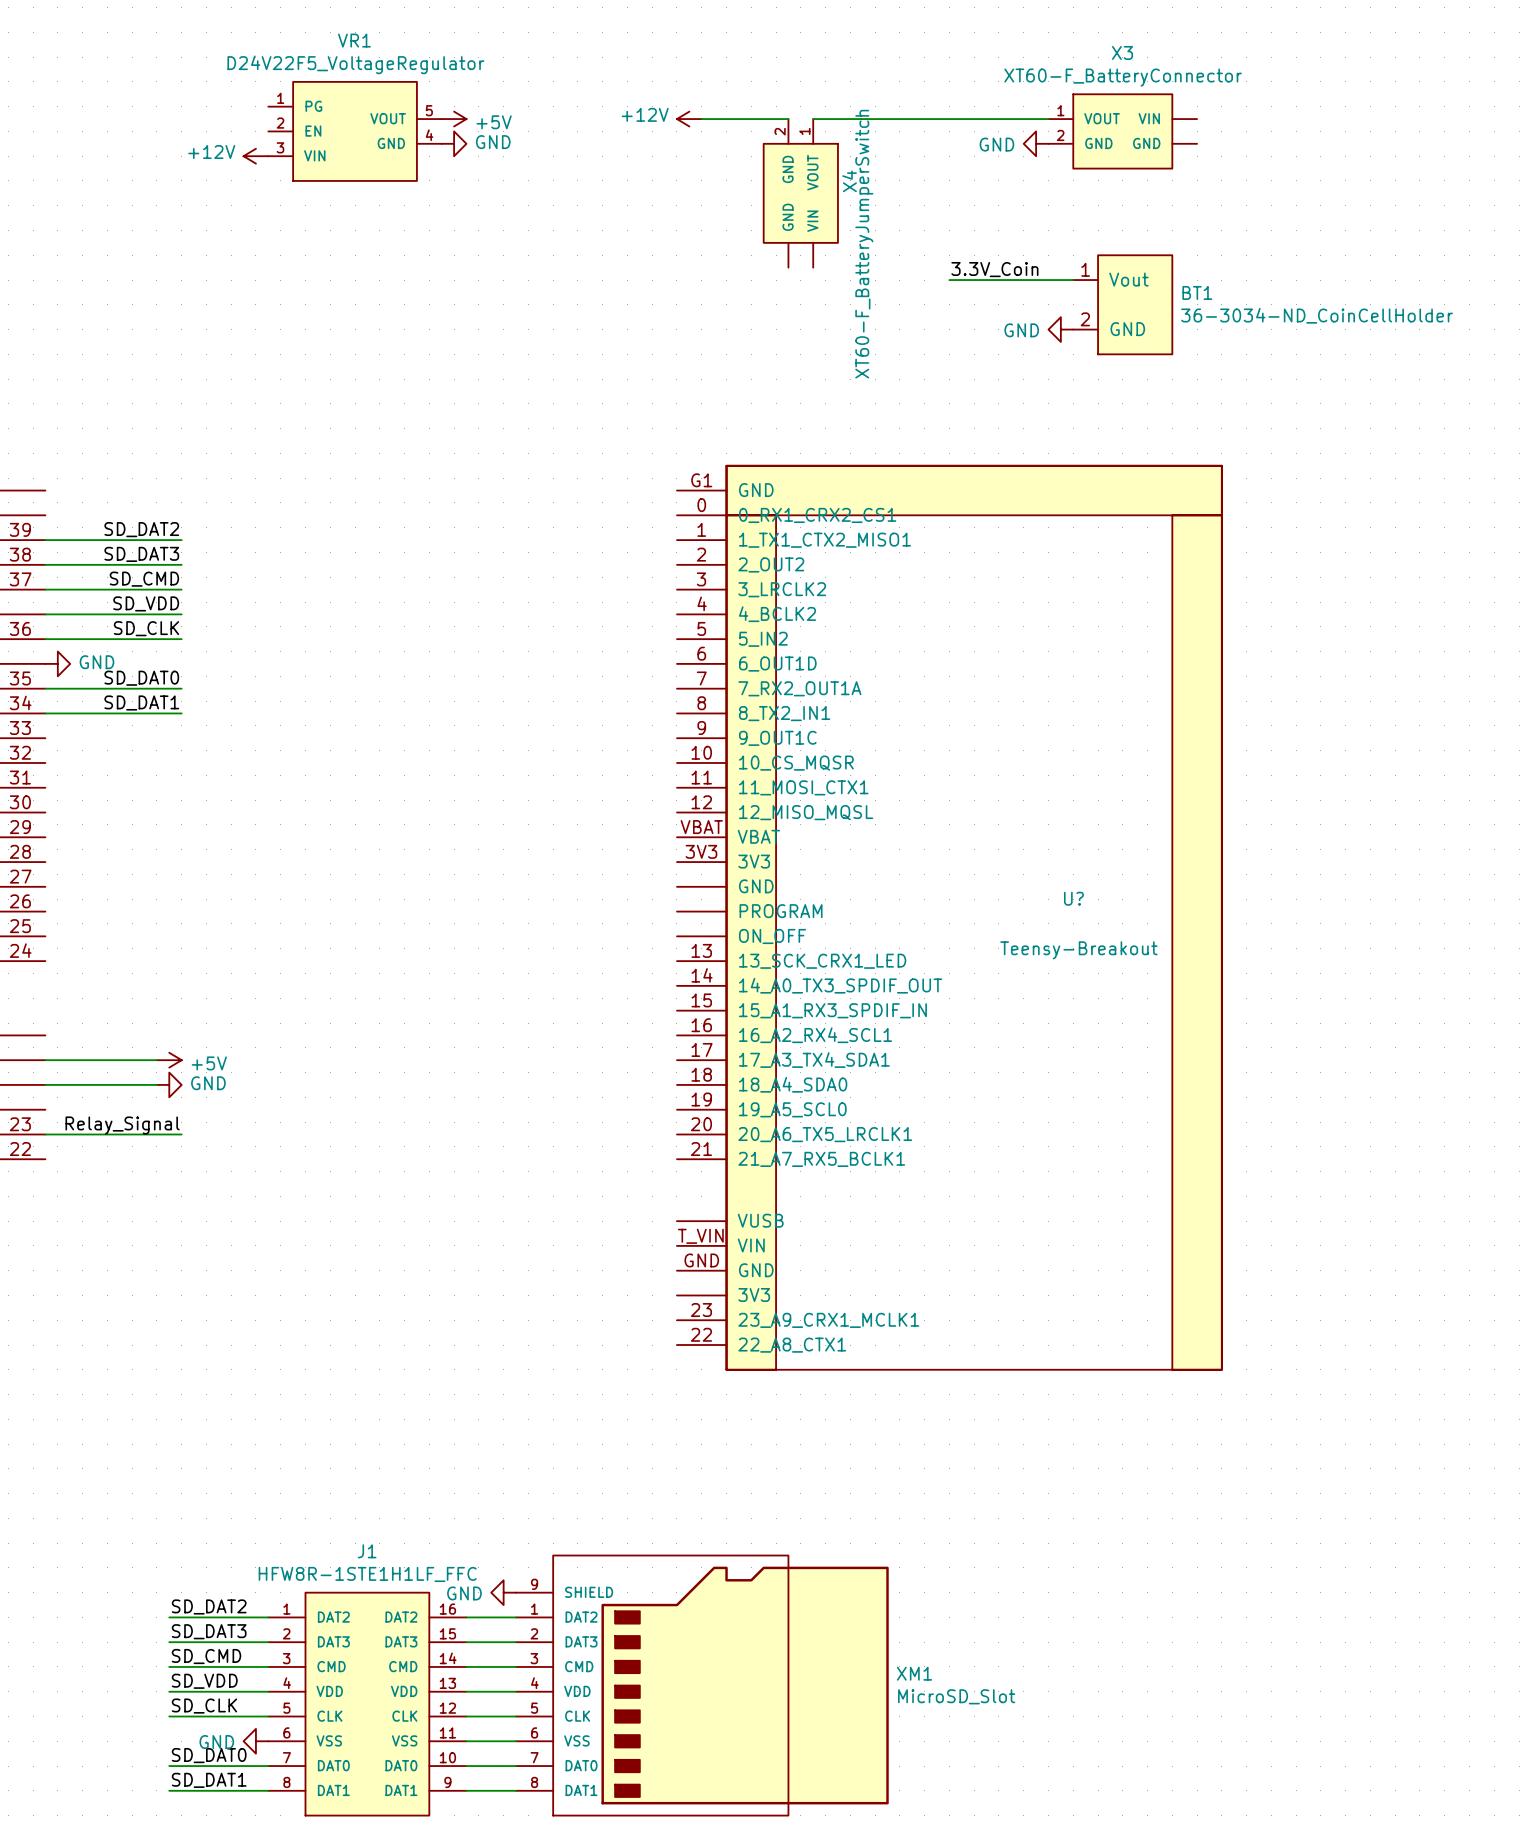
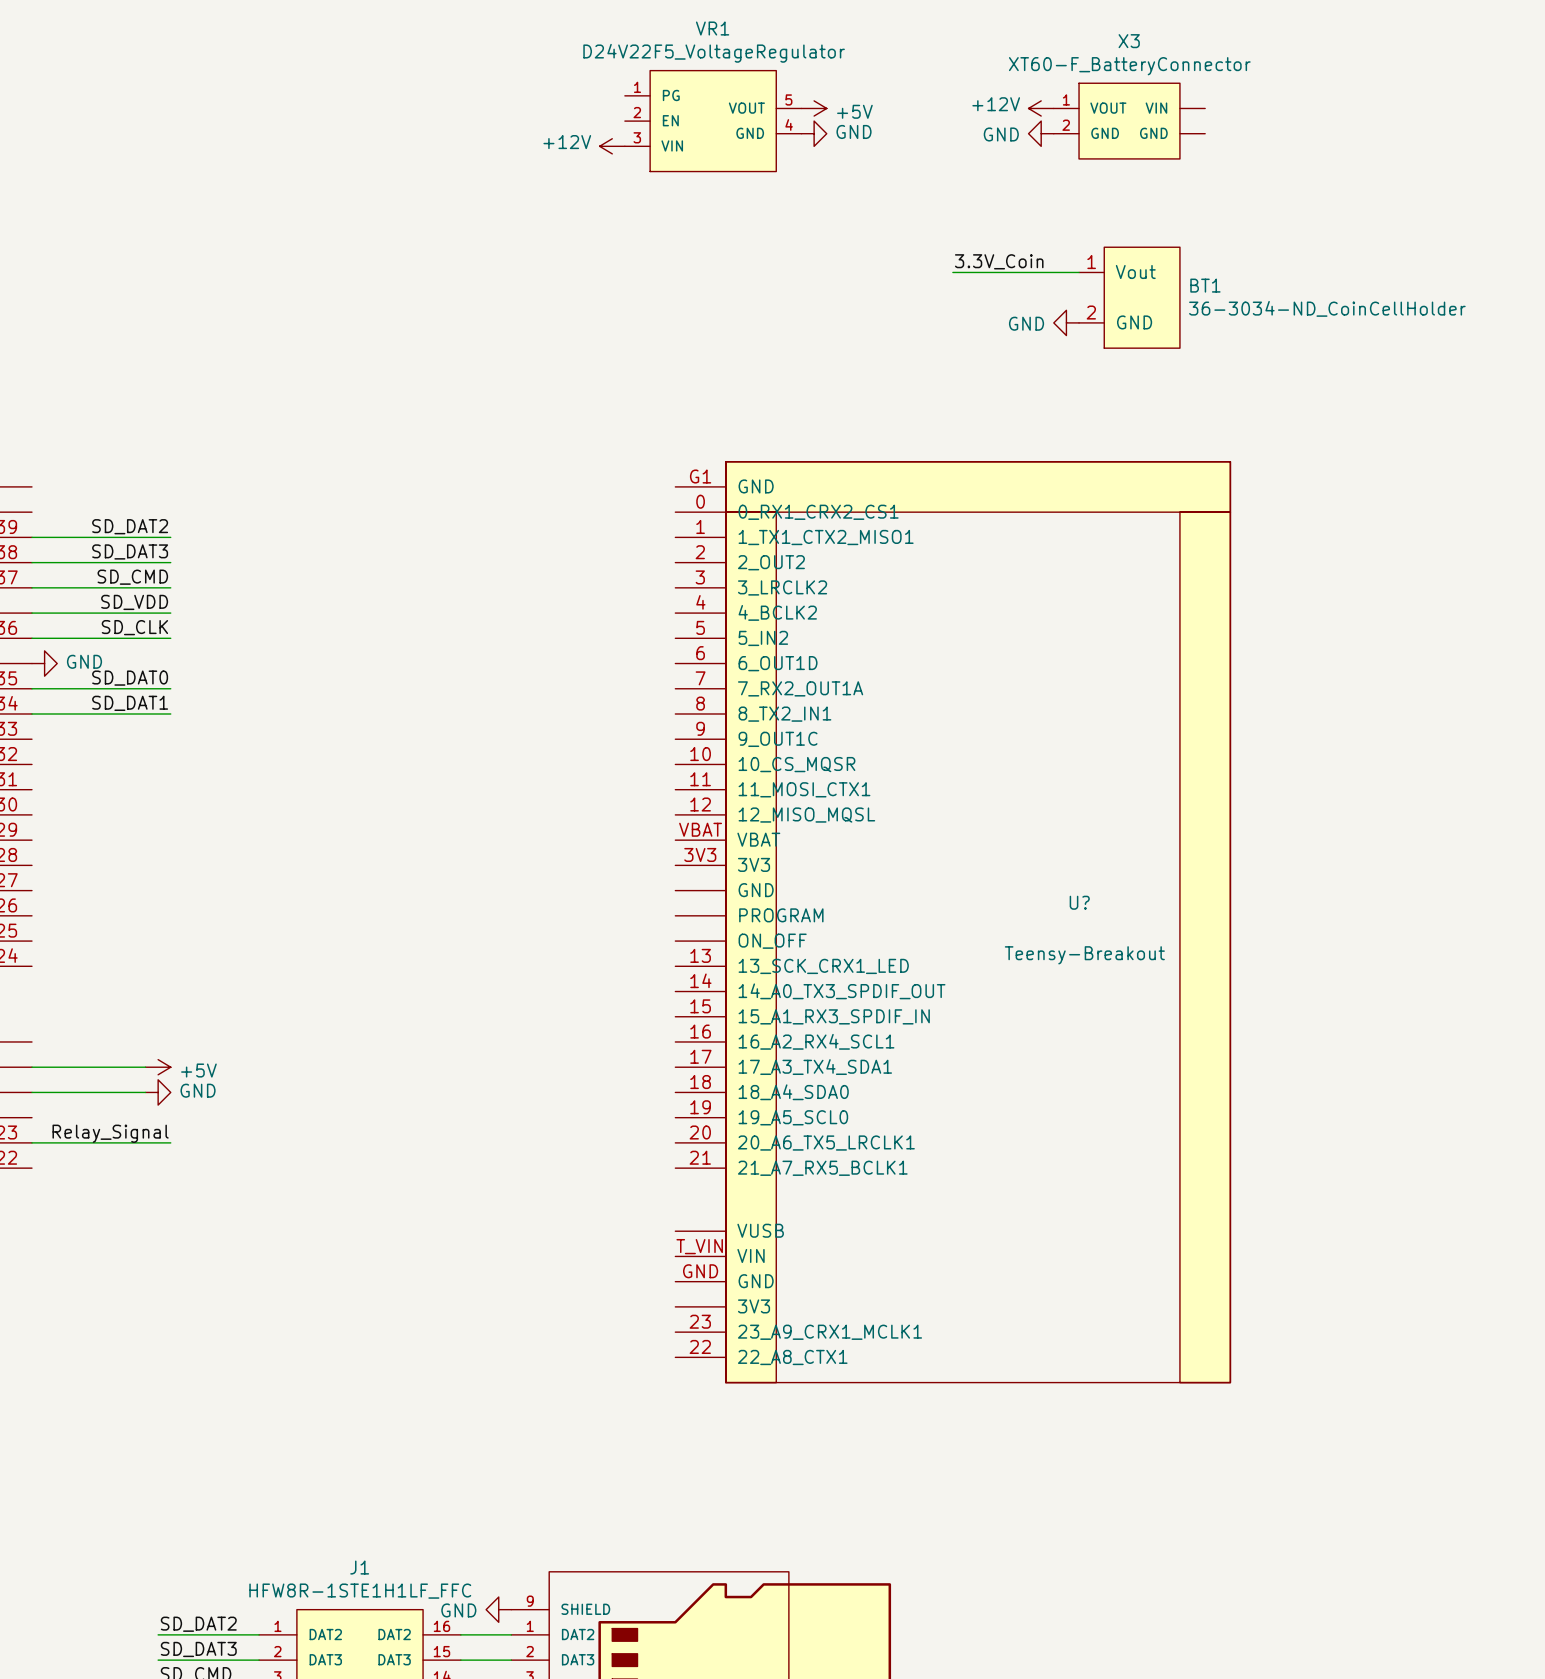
power symbol: +5V (454, 119) -> none
power symbol position: +12V (689, 119) -> +12V (612, 146)
wire: (813, 119) (1048, 119) -> none
power symbol: none -> +5V (814, 108)
power symbol: none -> +12V (1041, 108)
VR1 position: (355, 131) -> (713, 121)
power symbol: GND (454, 143) -> none
power symbol: none -> GND (814, 133)
power symbol: +12V (255, 156) -> none
X4: XT60-F_BatteryJumperSwitch (800, 193) -> none

